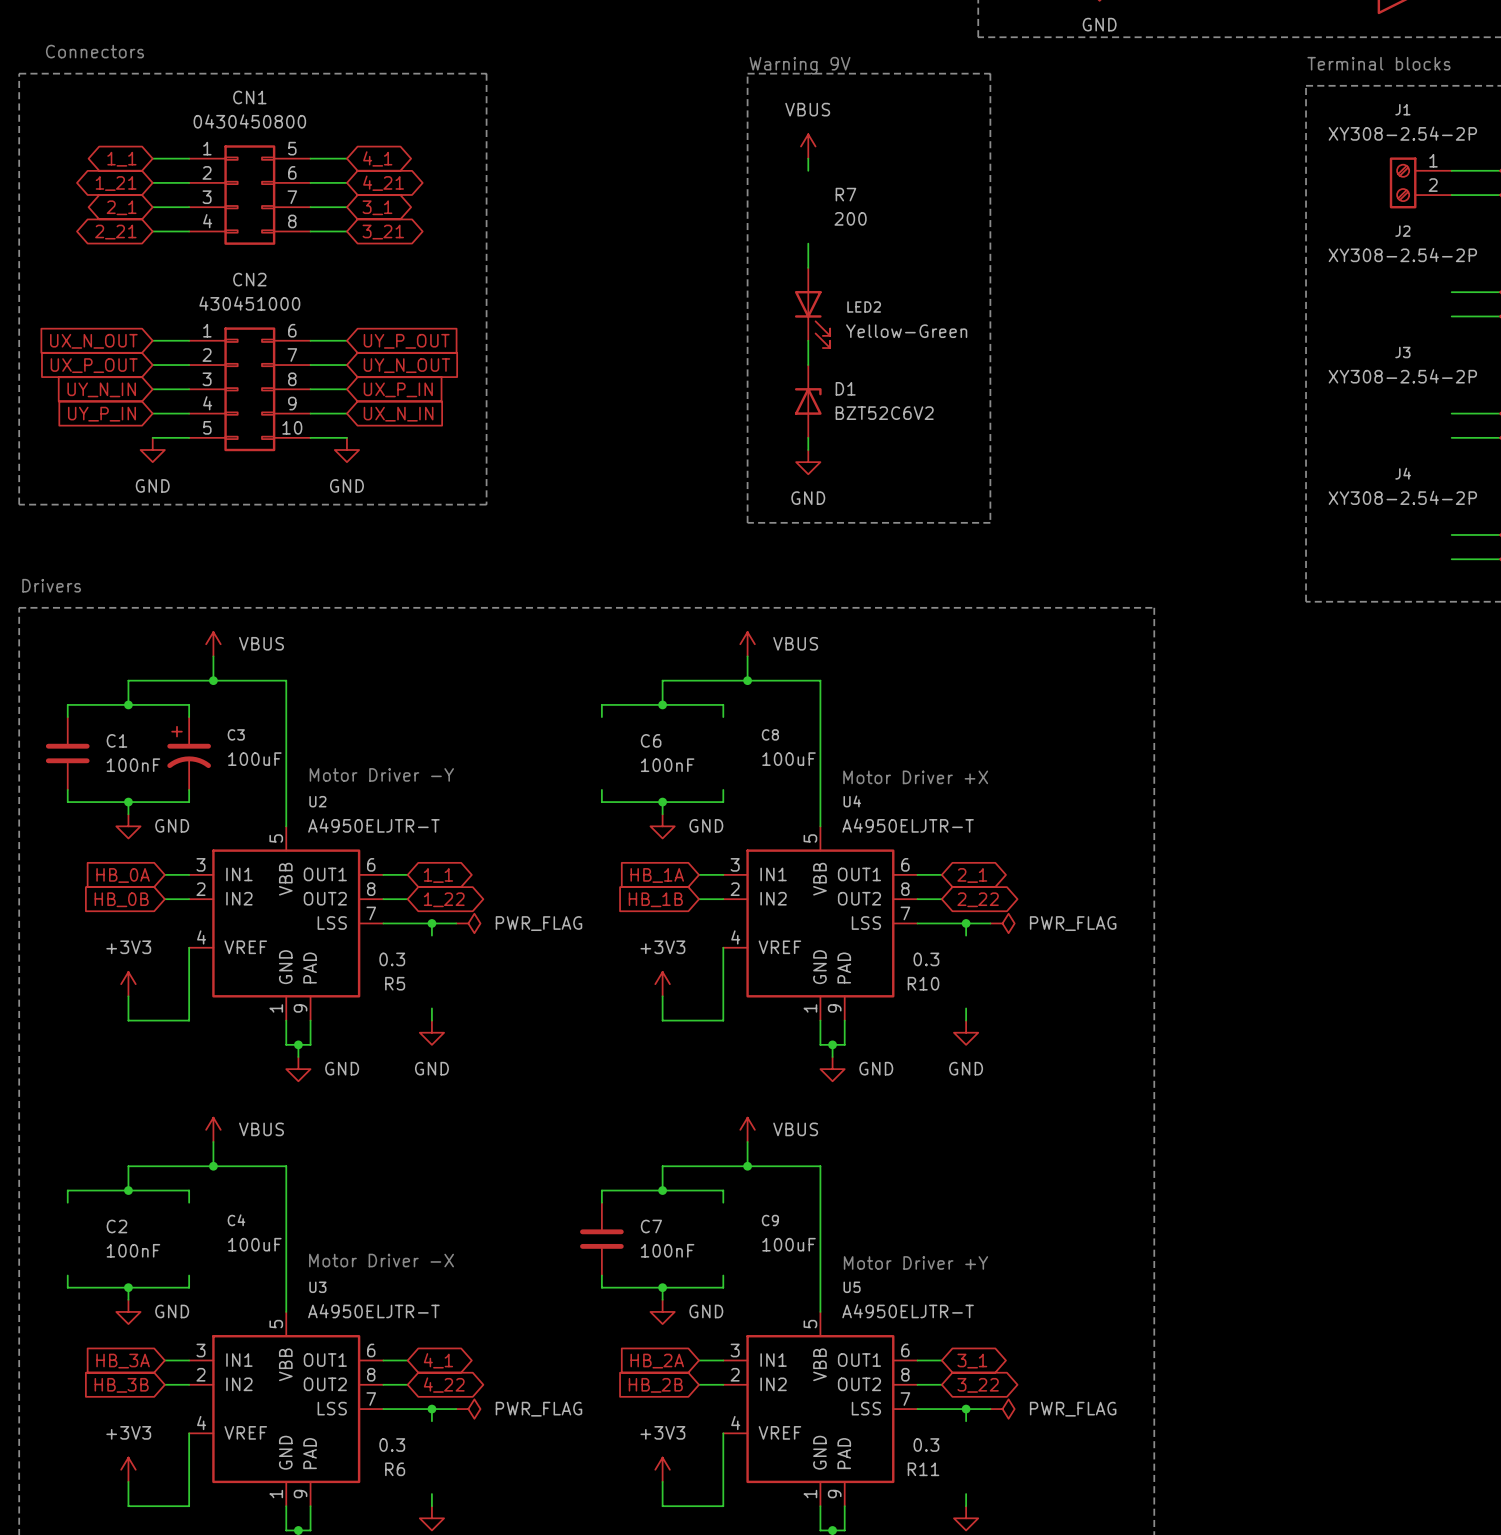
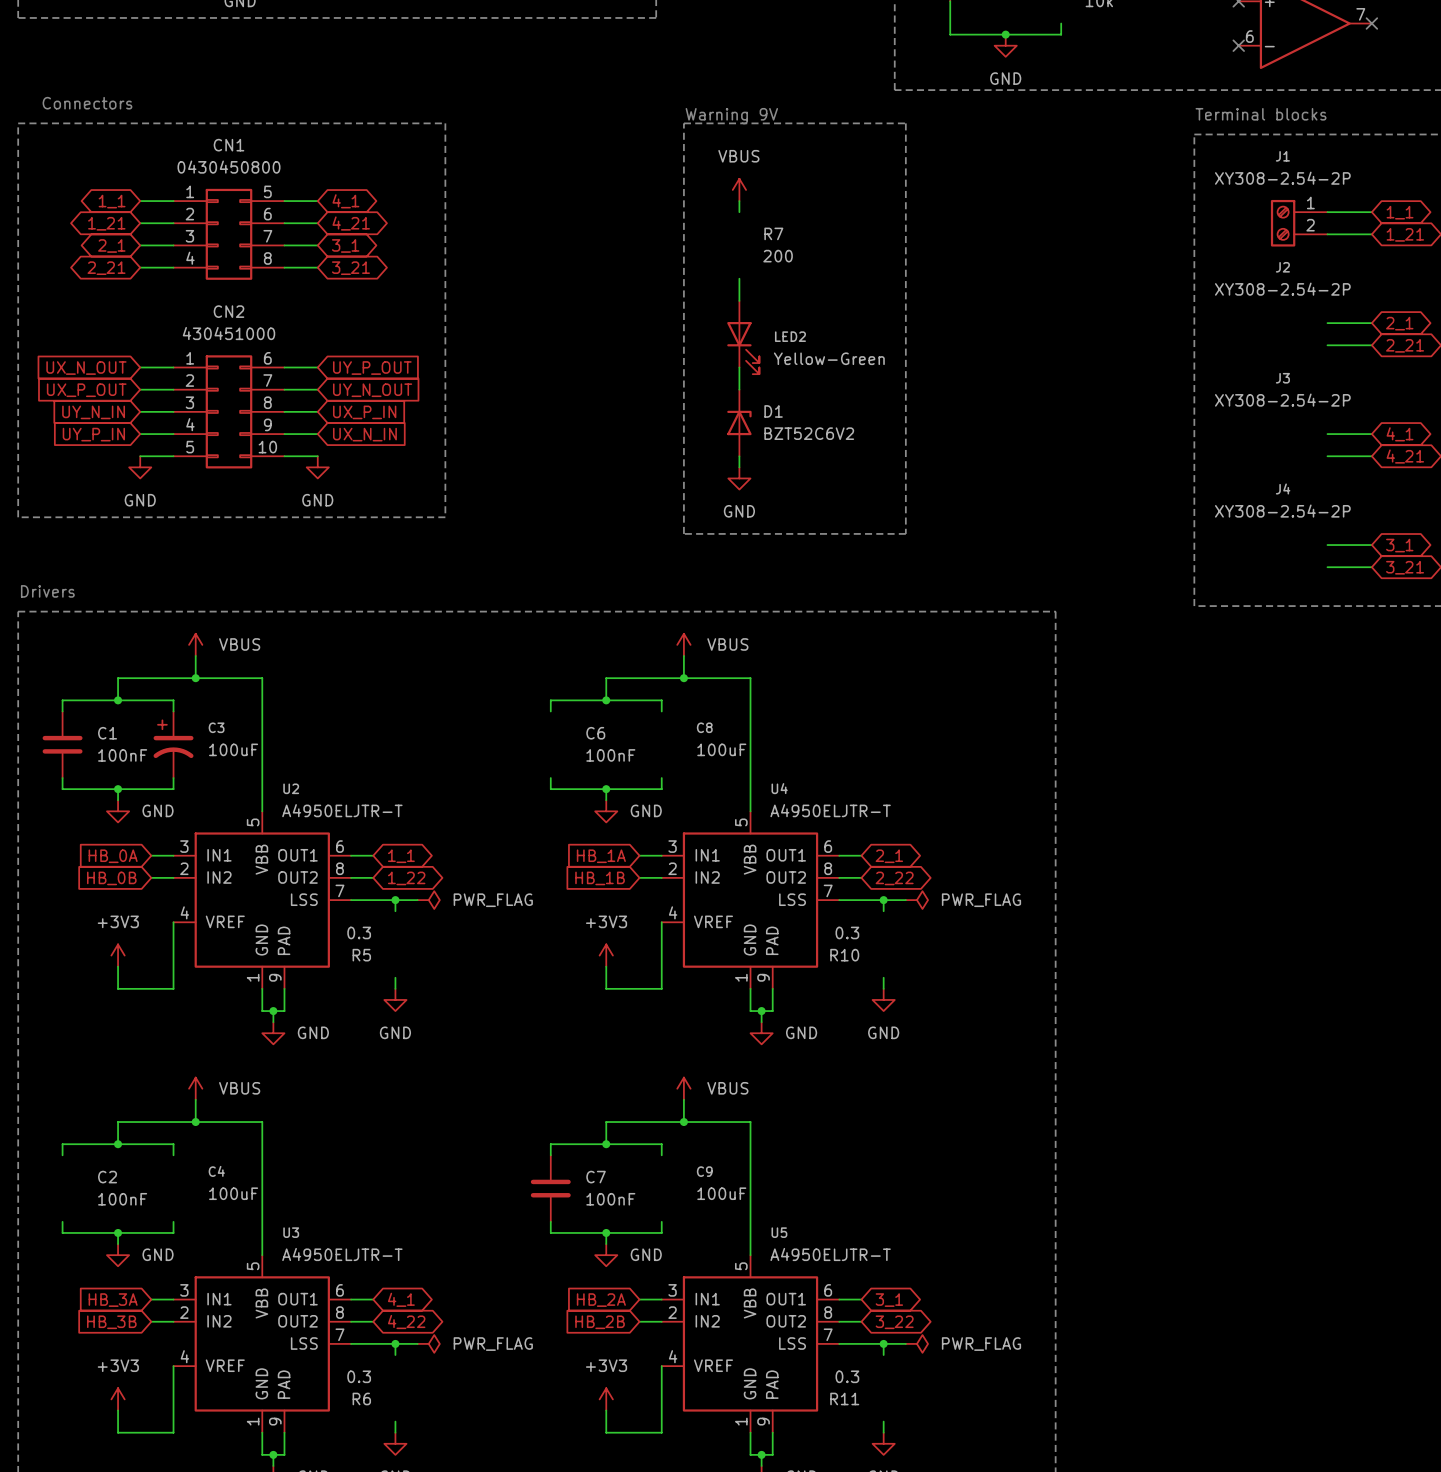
text: Motor Driver -Y (381, 774) -> none
text: Motor Driver +X (915, 777) -> none
text: Motor Driver -X (381, 1260) -> none
text: Motor Driver +Y (915, 1262) -> none

